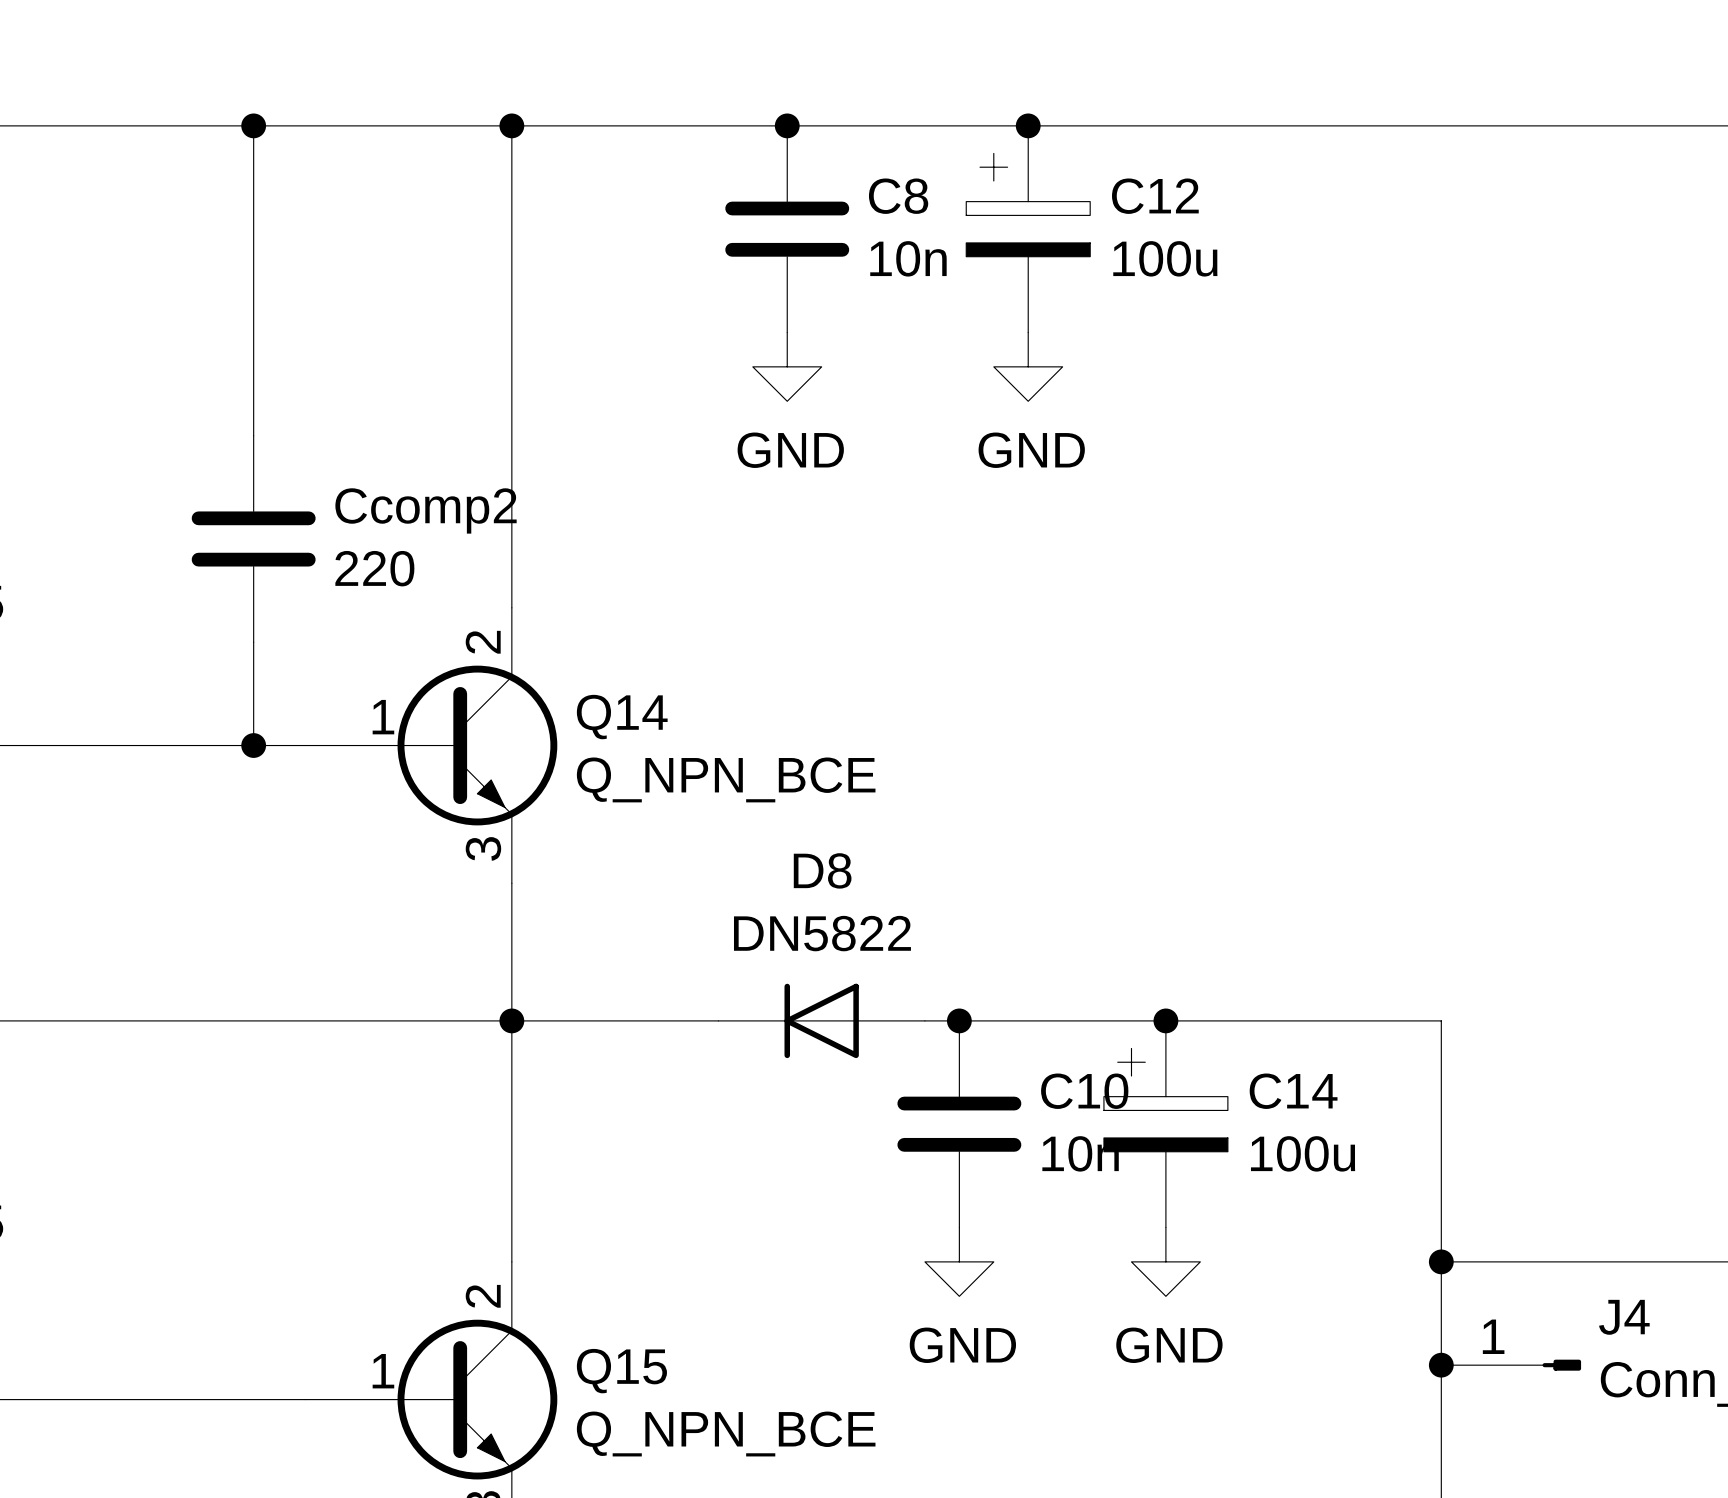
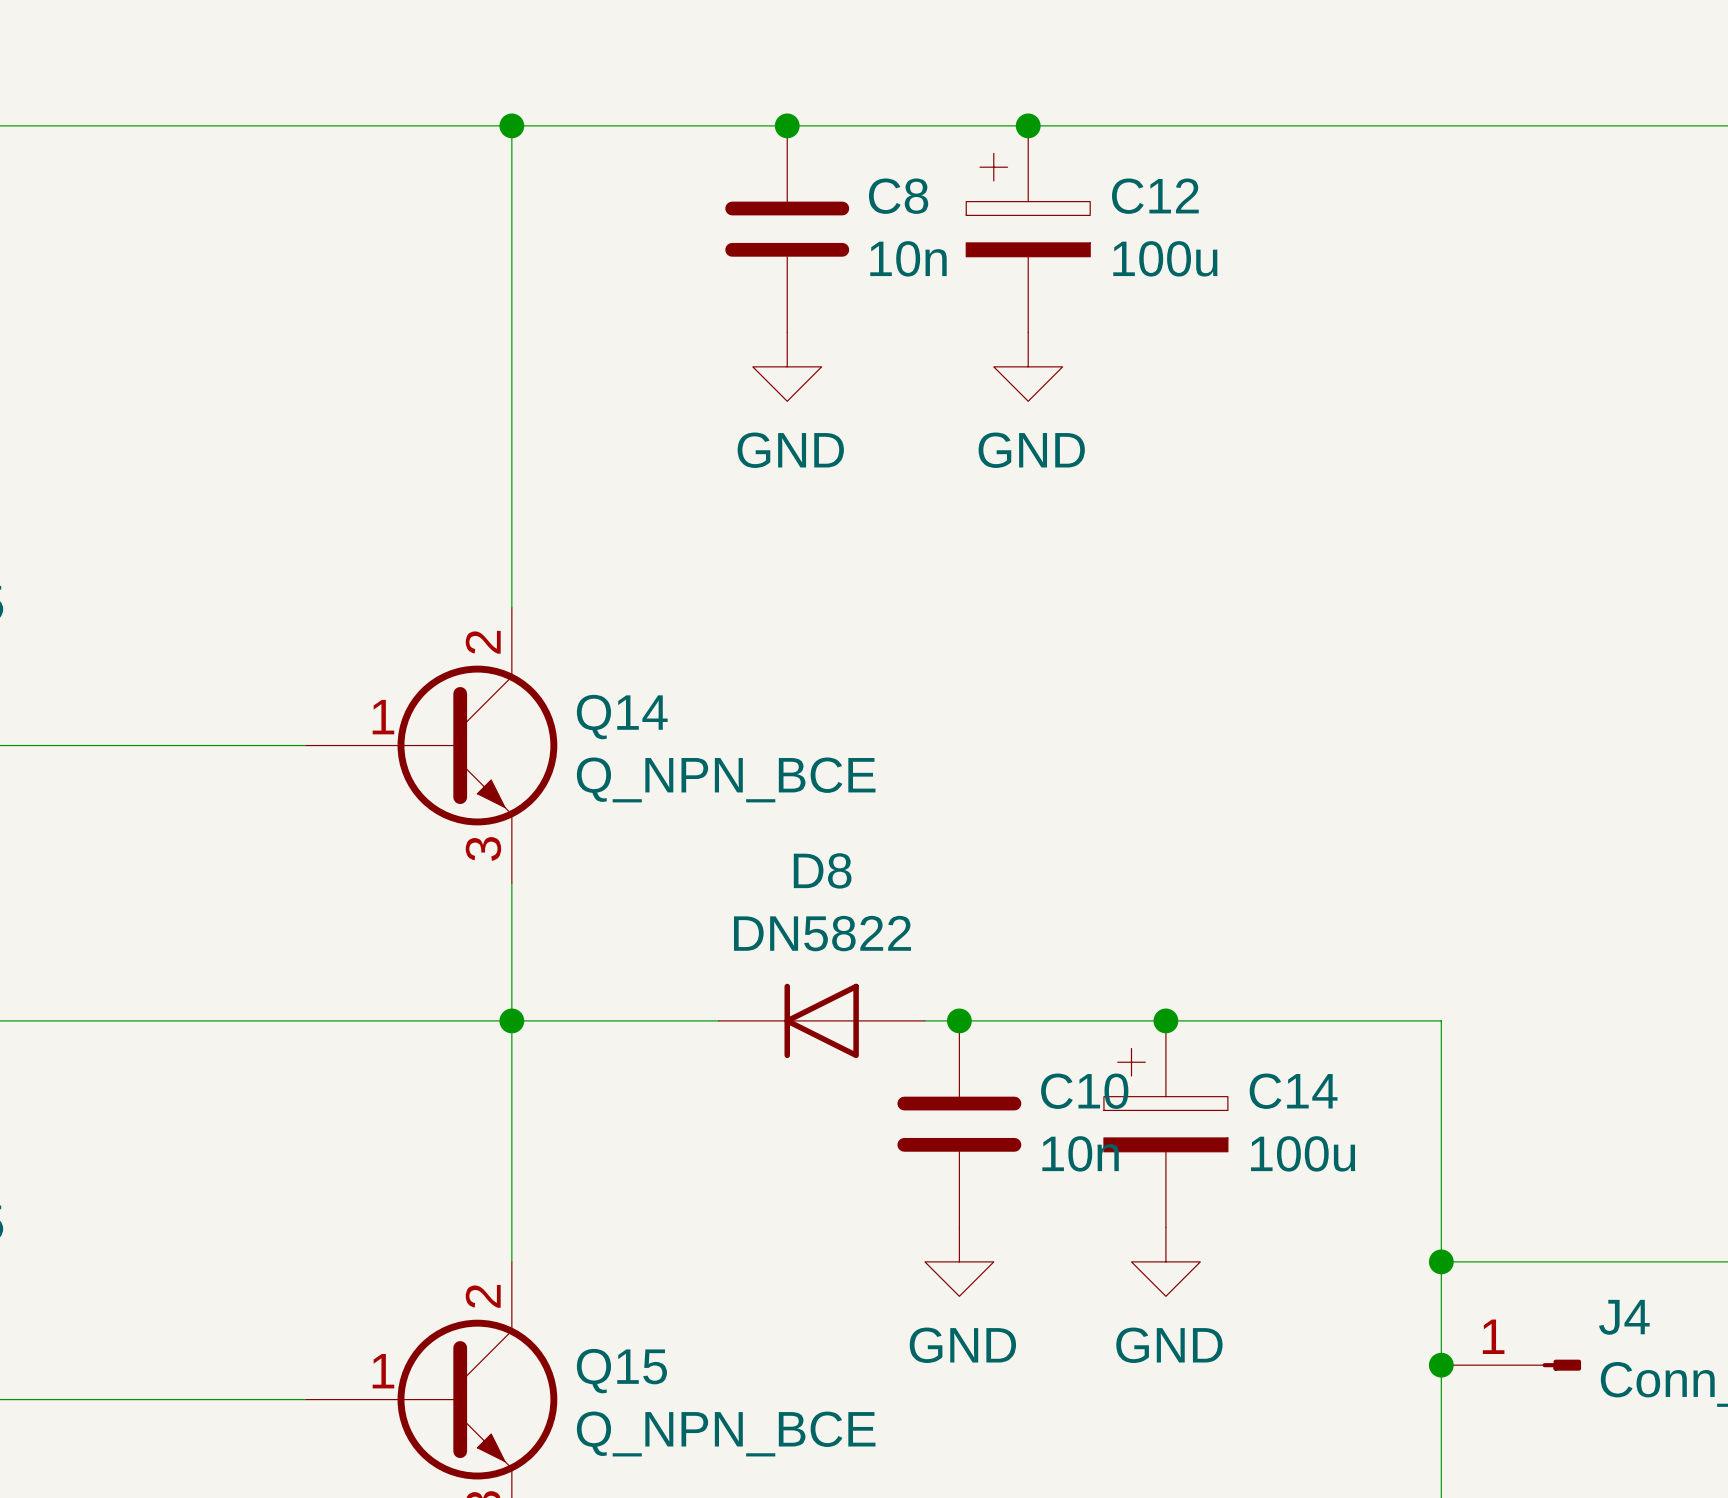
wire: (253, 125) (253, 435) -> none
junction: (253, 125) -> none
Ccomp2: 220 (253, 538) -> none
wire: (253, 642) (253, 745) -> none
junction: (253, 745) -> none

